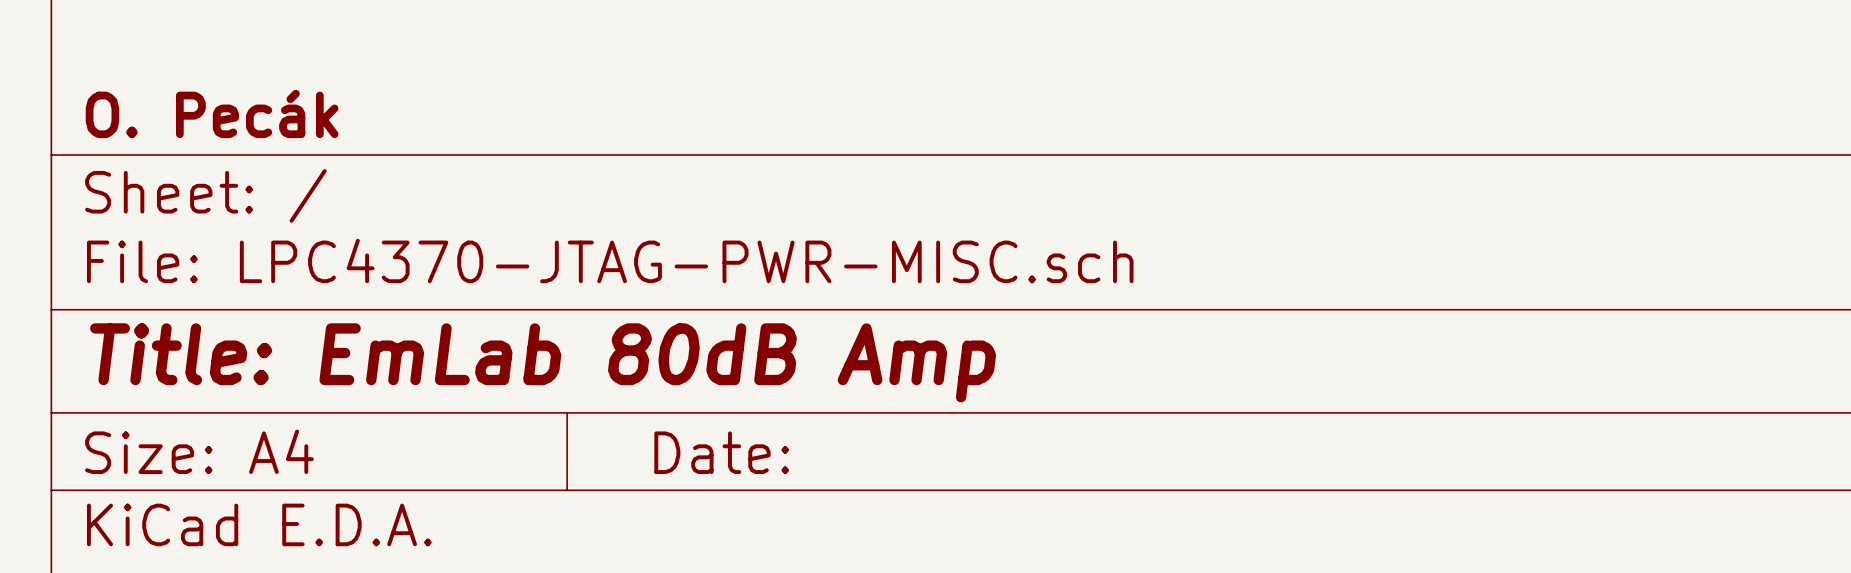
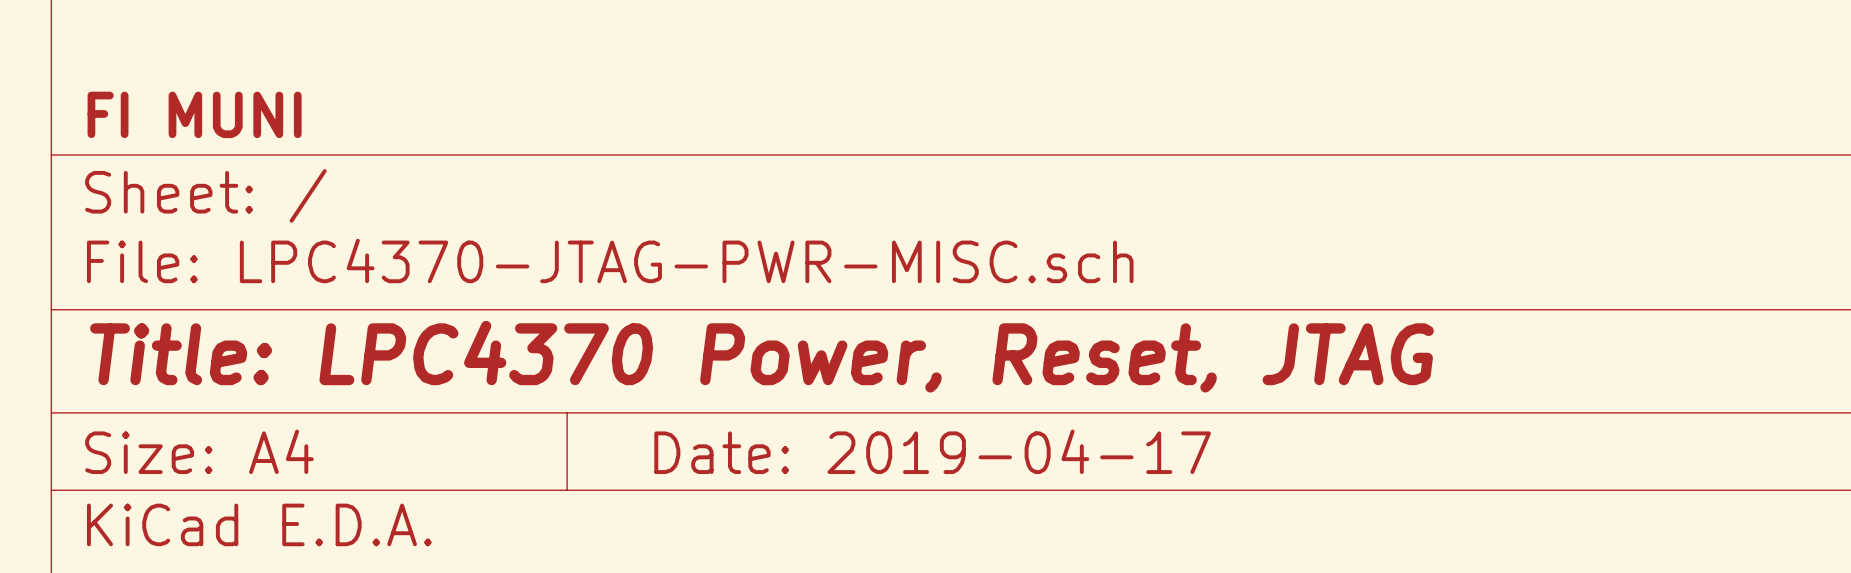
title block: O. Pecák (212, 113) -> FI MUNI (194, 114)
title block: Title: EmLab 80dB Amp (543, 362) -> Title: LPC4370 Power, Reset, JTAG (761, 356)
title block: Date: (721, 452) -> Date: 2019-04-17 (932, 451)

